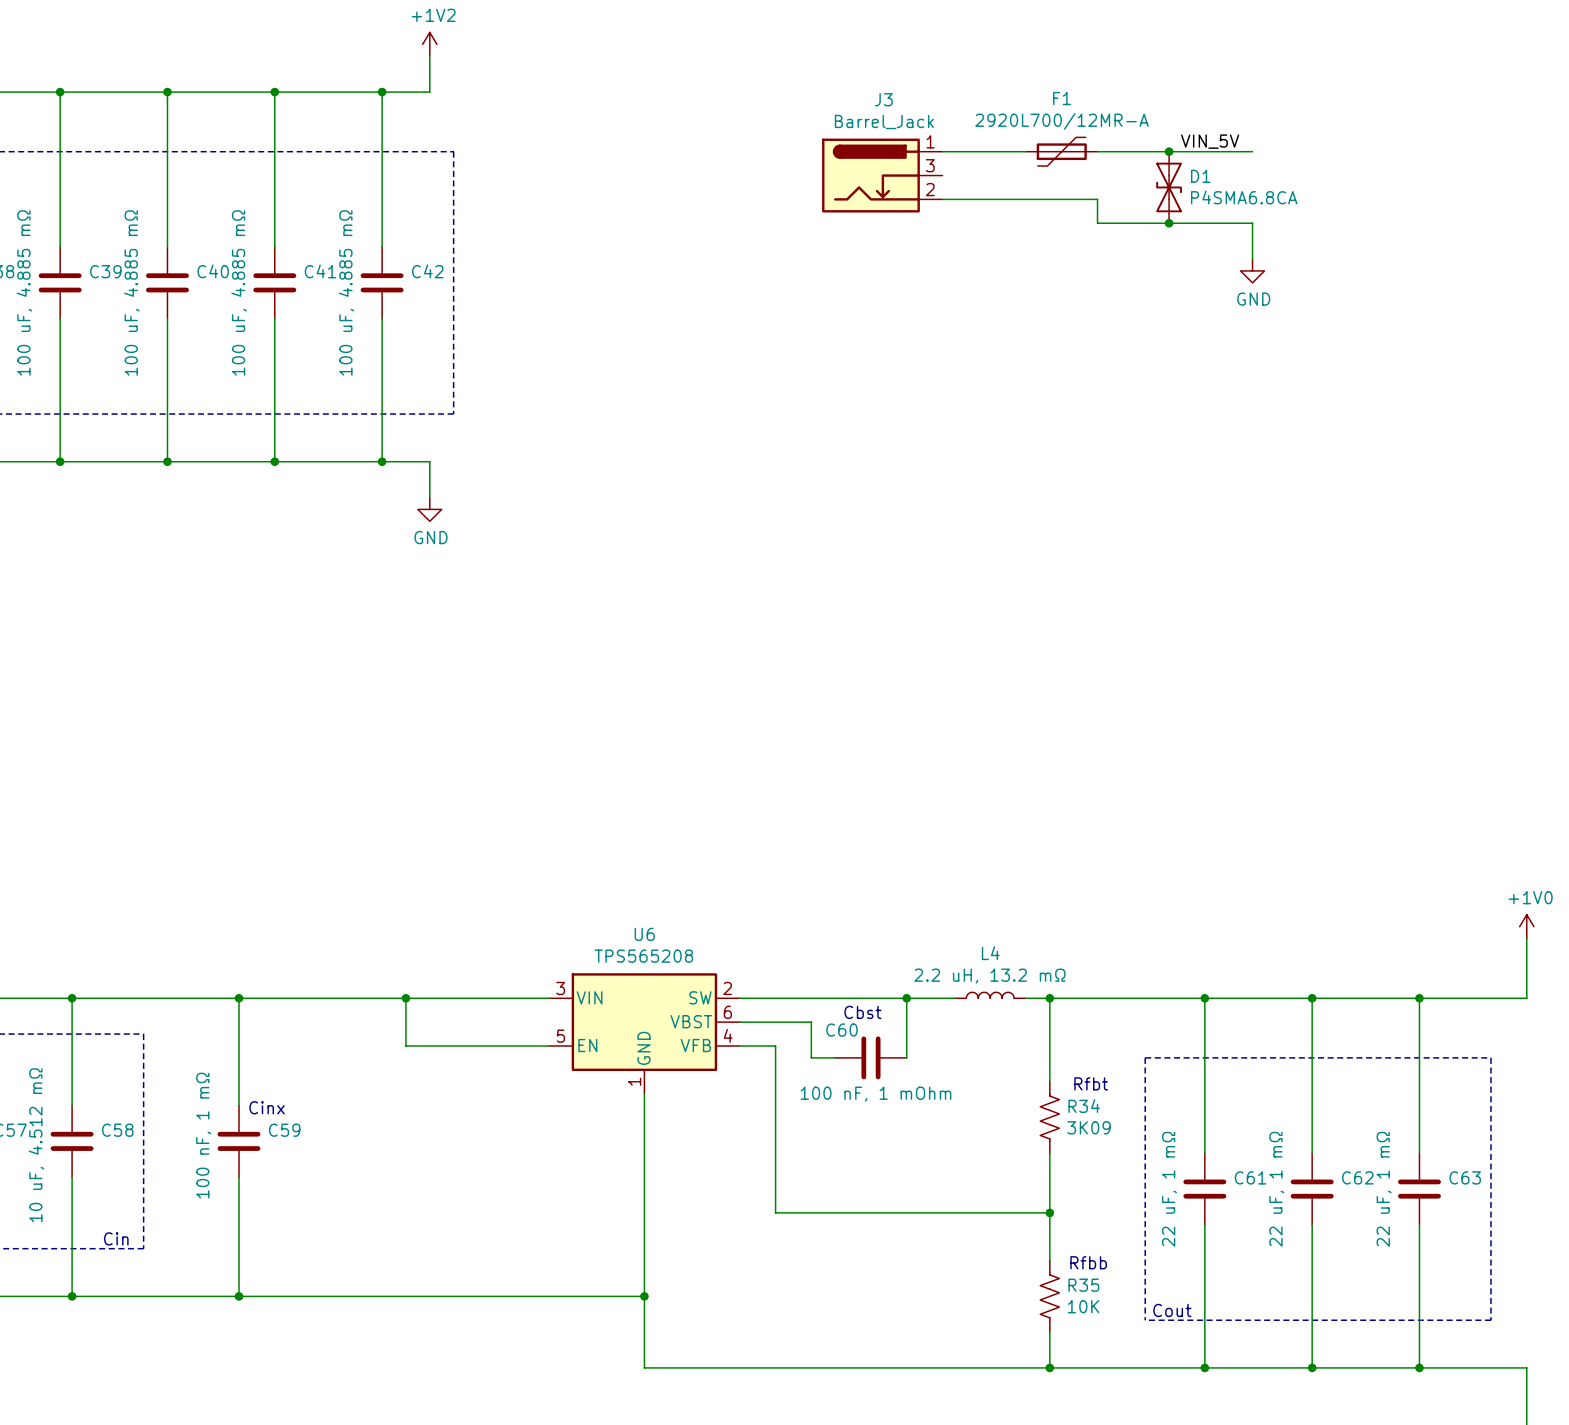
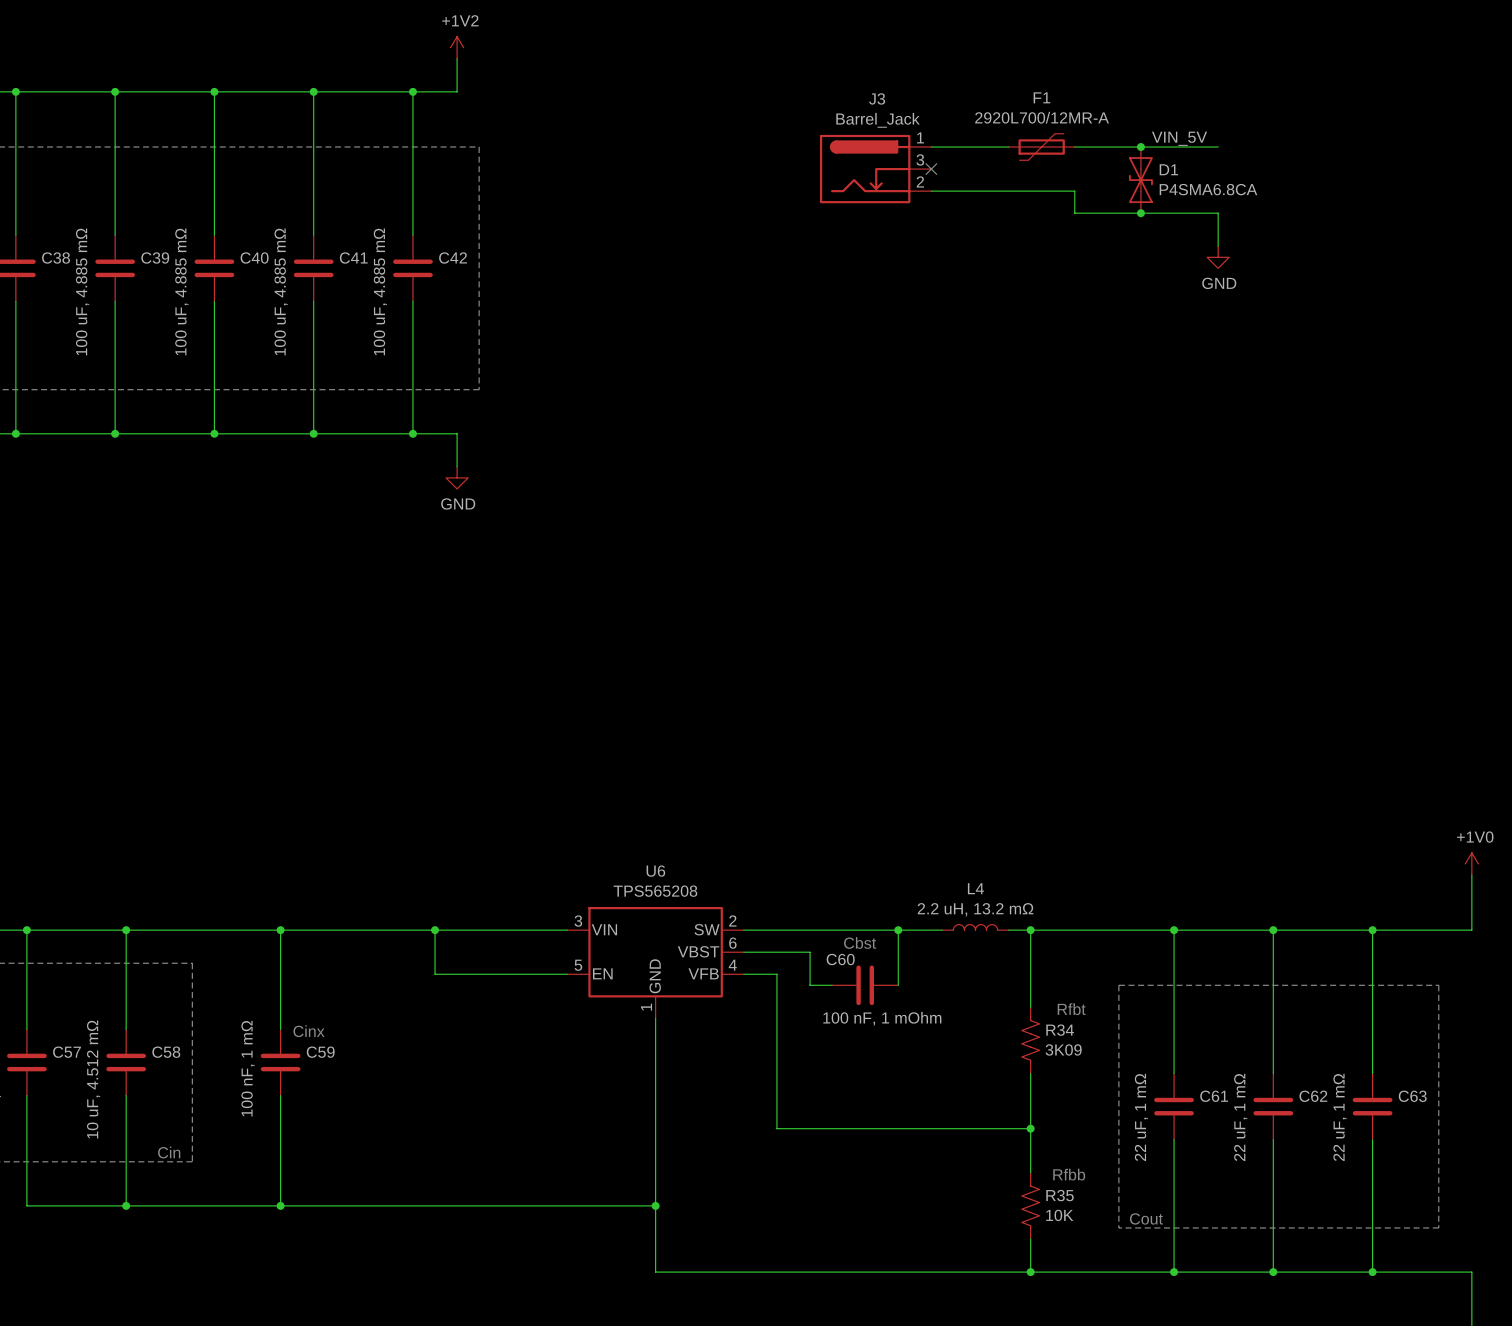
no-connect mark: none -> (931, 169)

